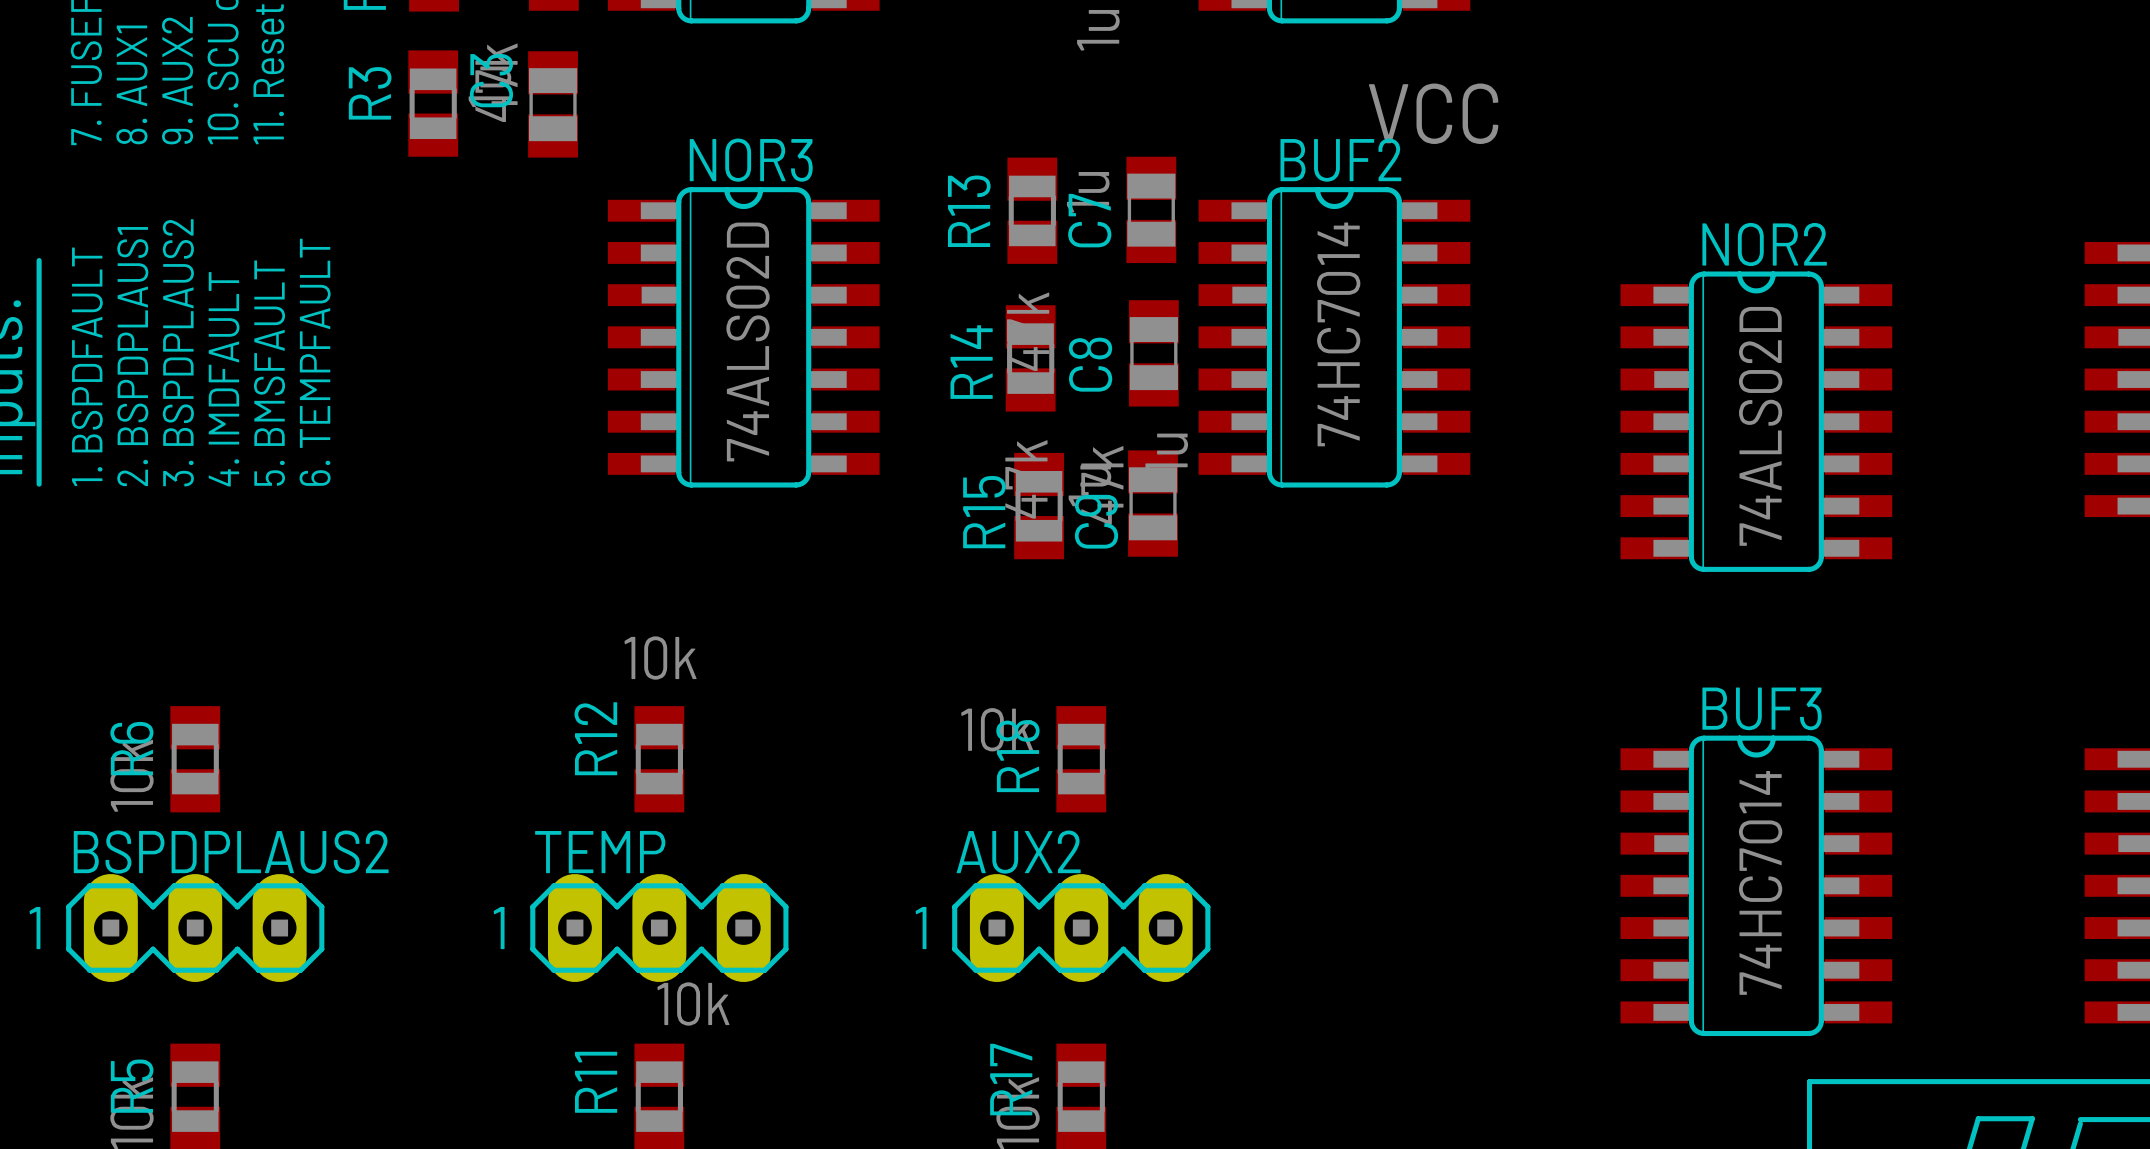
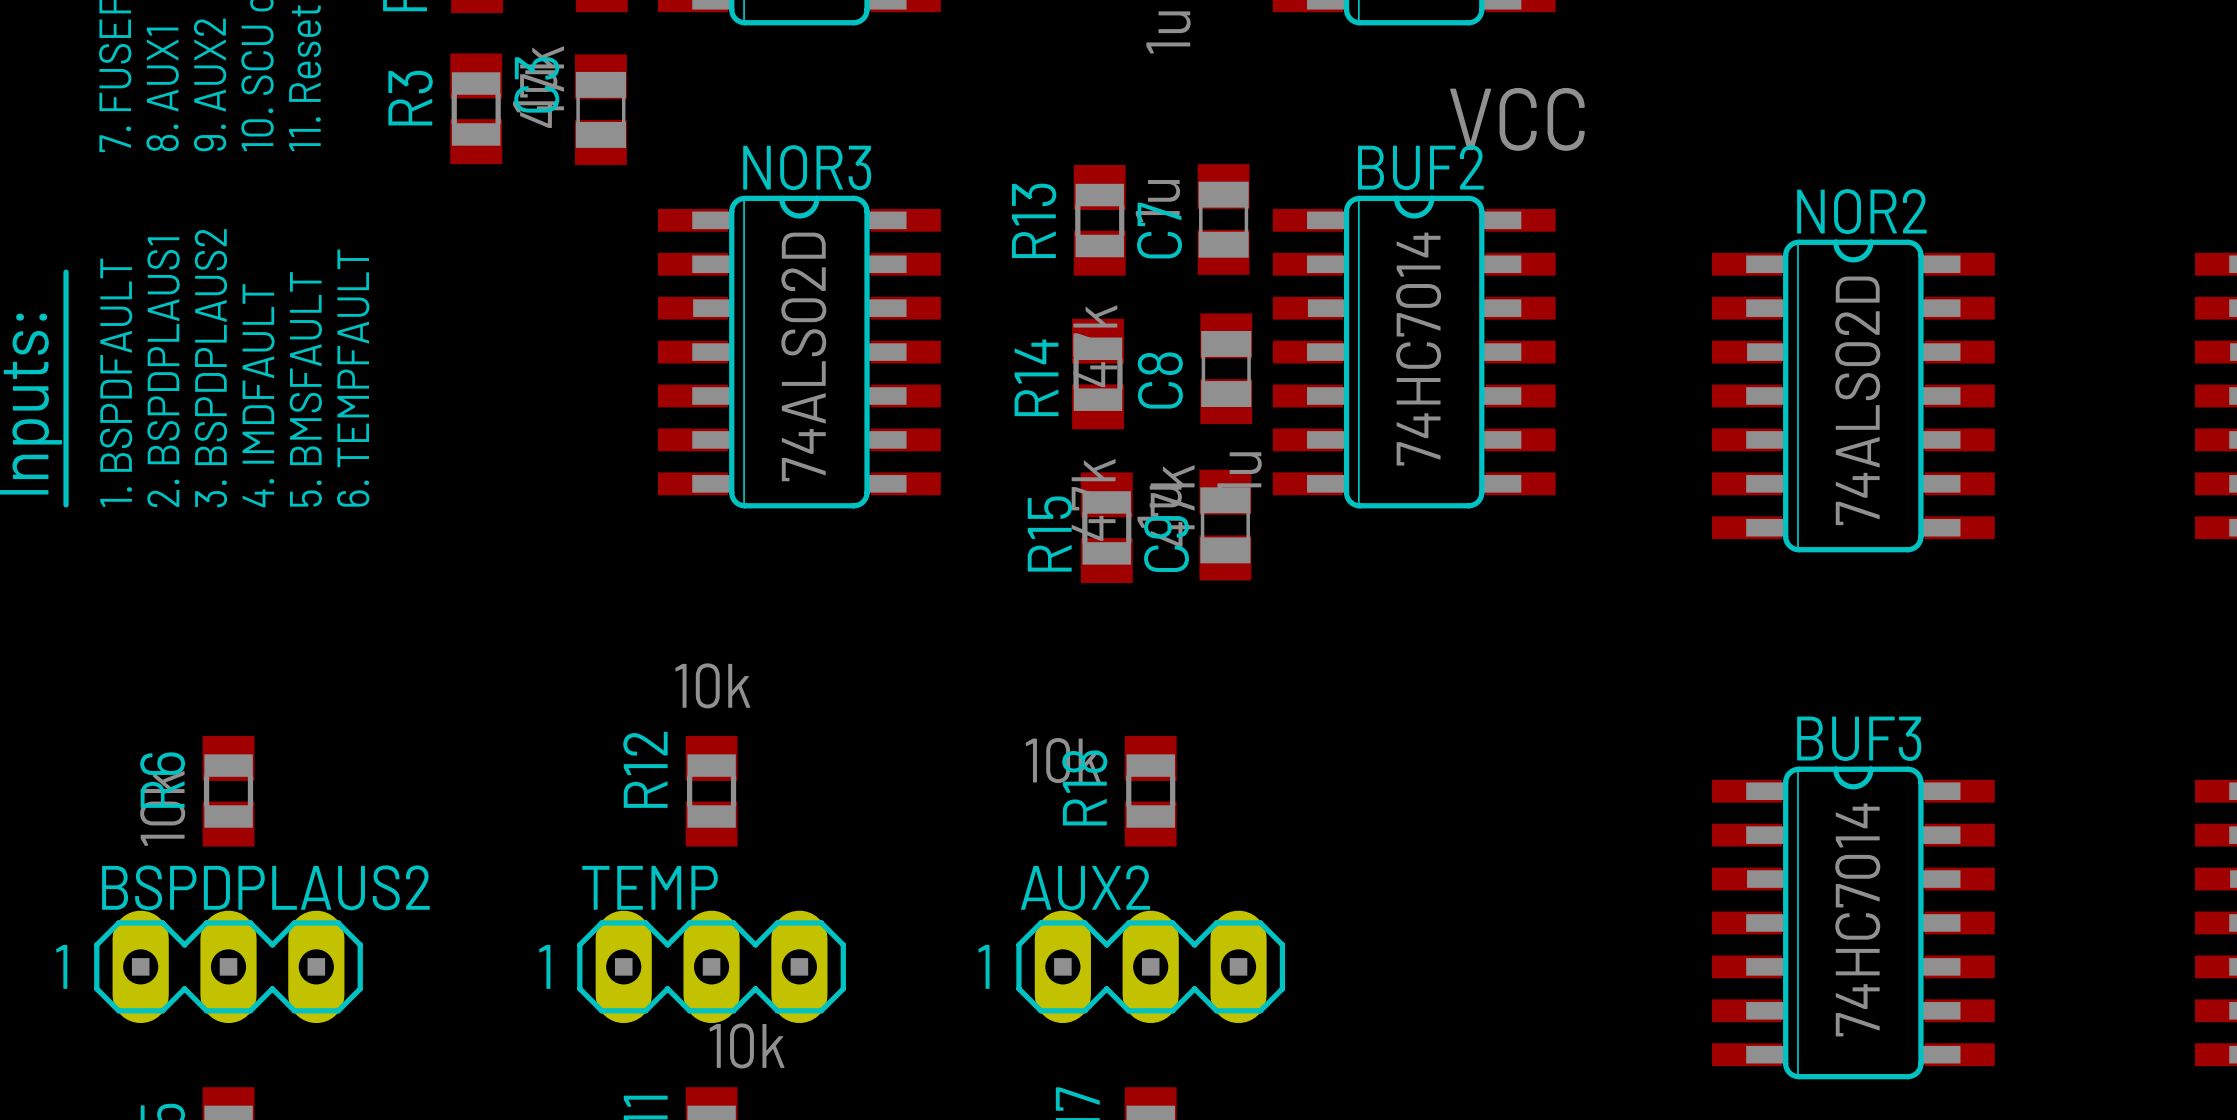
NOR2 position: (1756, 421) -> (1853, 396)

